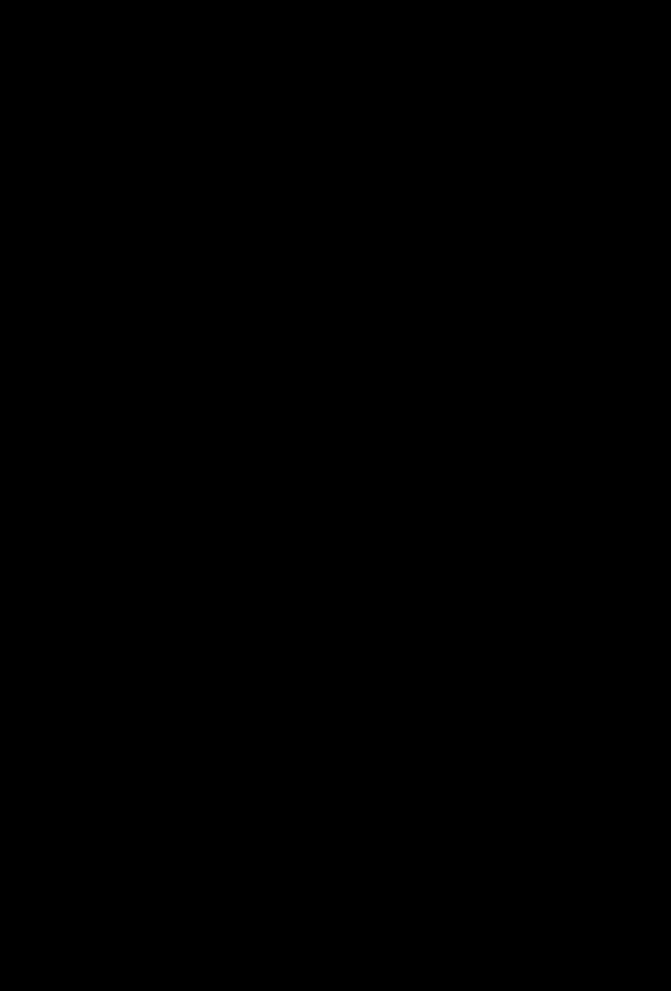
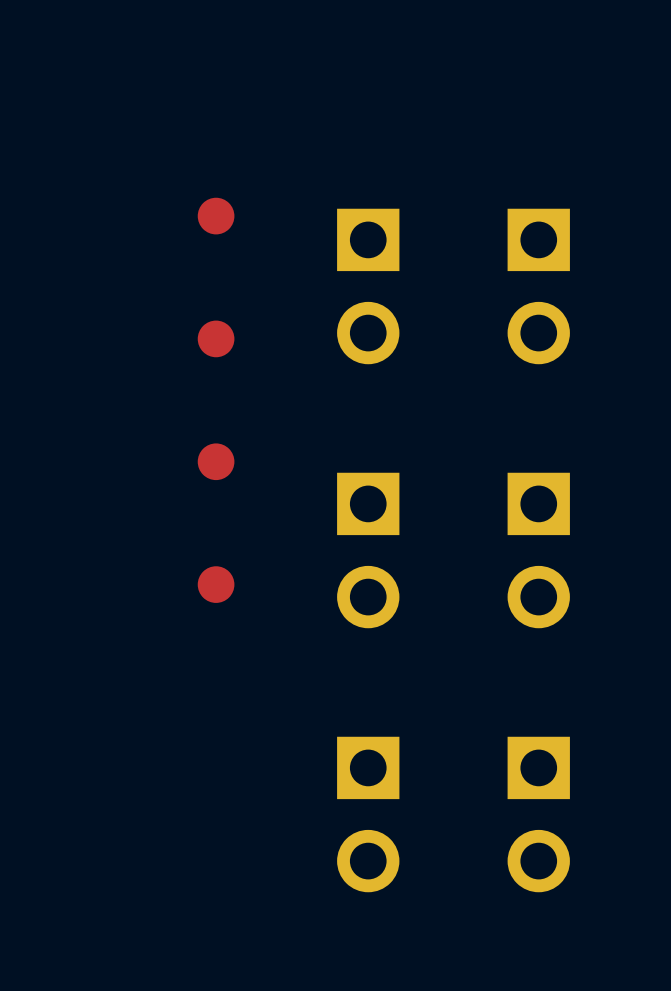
part: none -> (216, 216)
part: none -> (368, 286)
part: none -> (538, 286)
part: none -> (216, 338)
part: none -> (216, 461)
part: none -> (368, 550)
part: none -> (538, 550)
part: none -> (216, 584)
part: none -> (368, 814)
part: none -> (538, 814)

